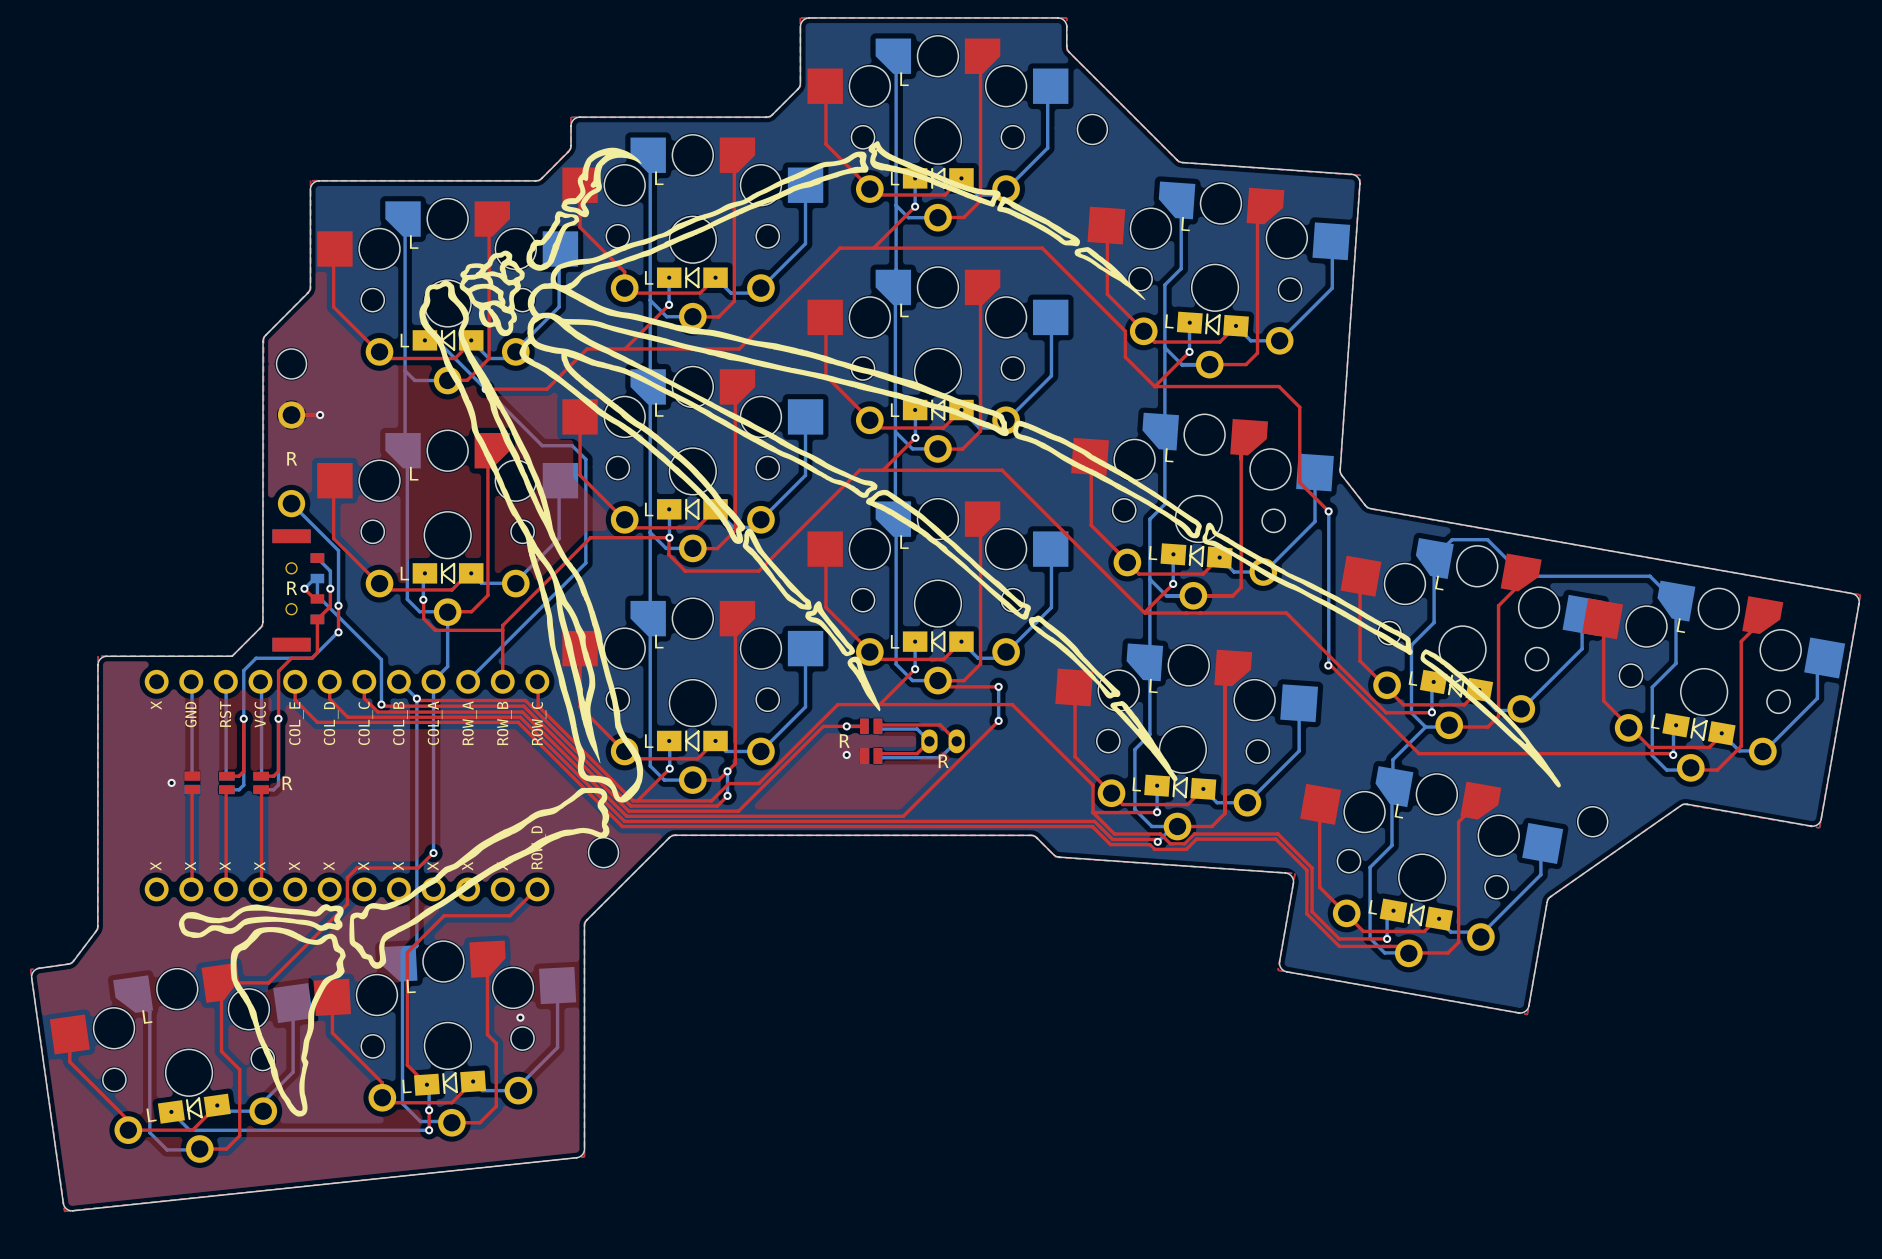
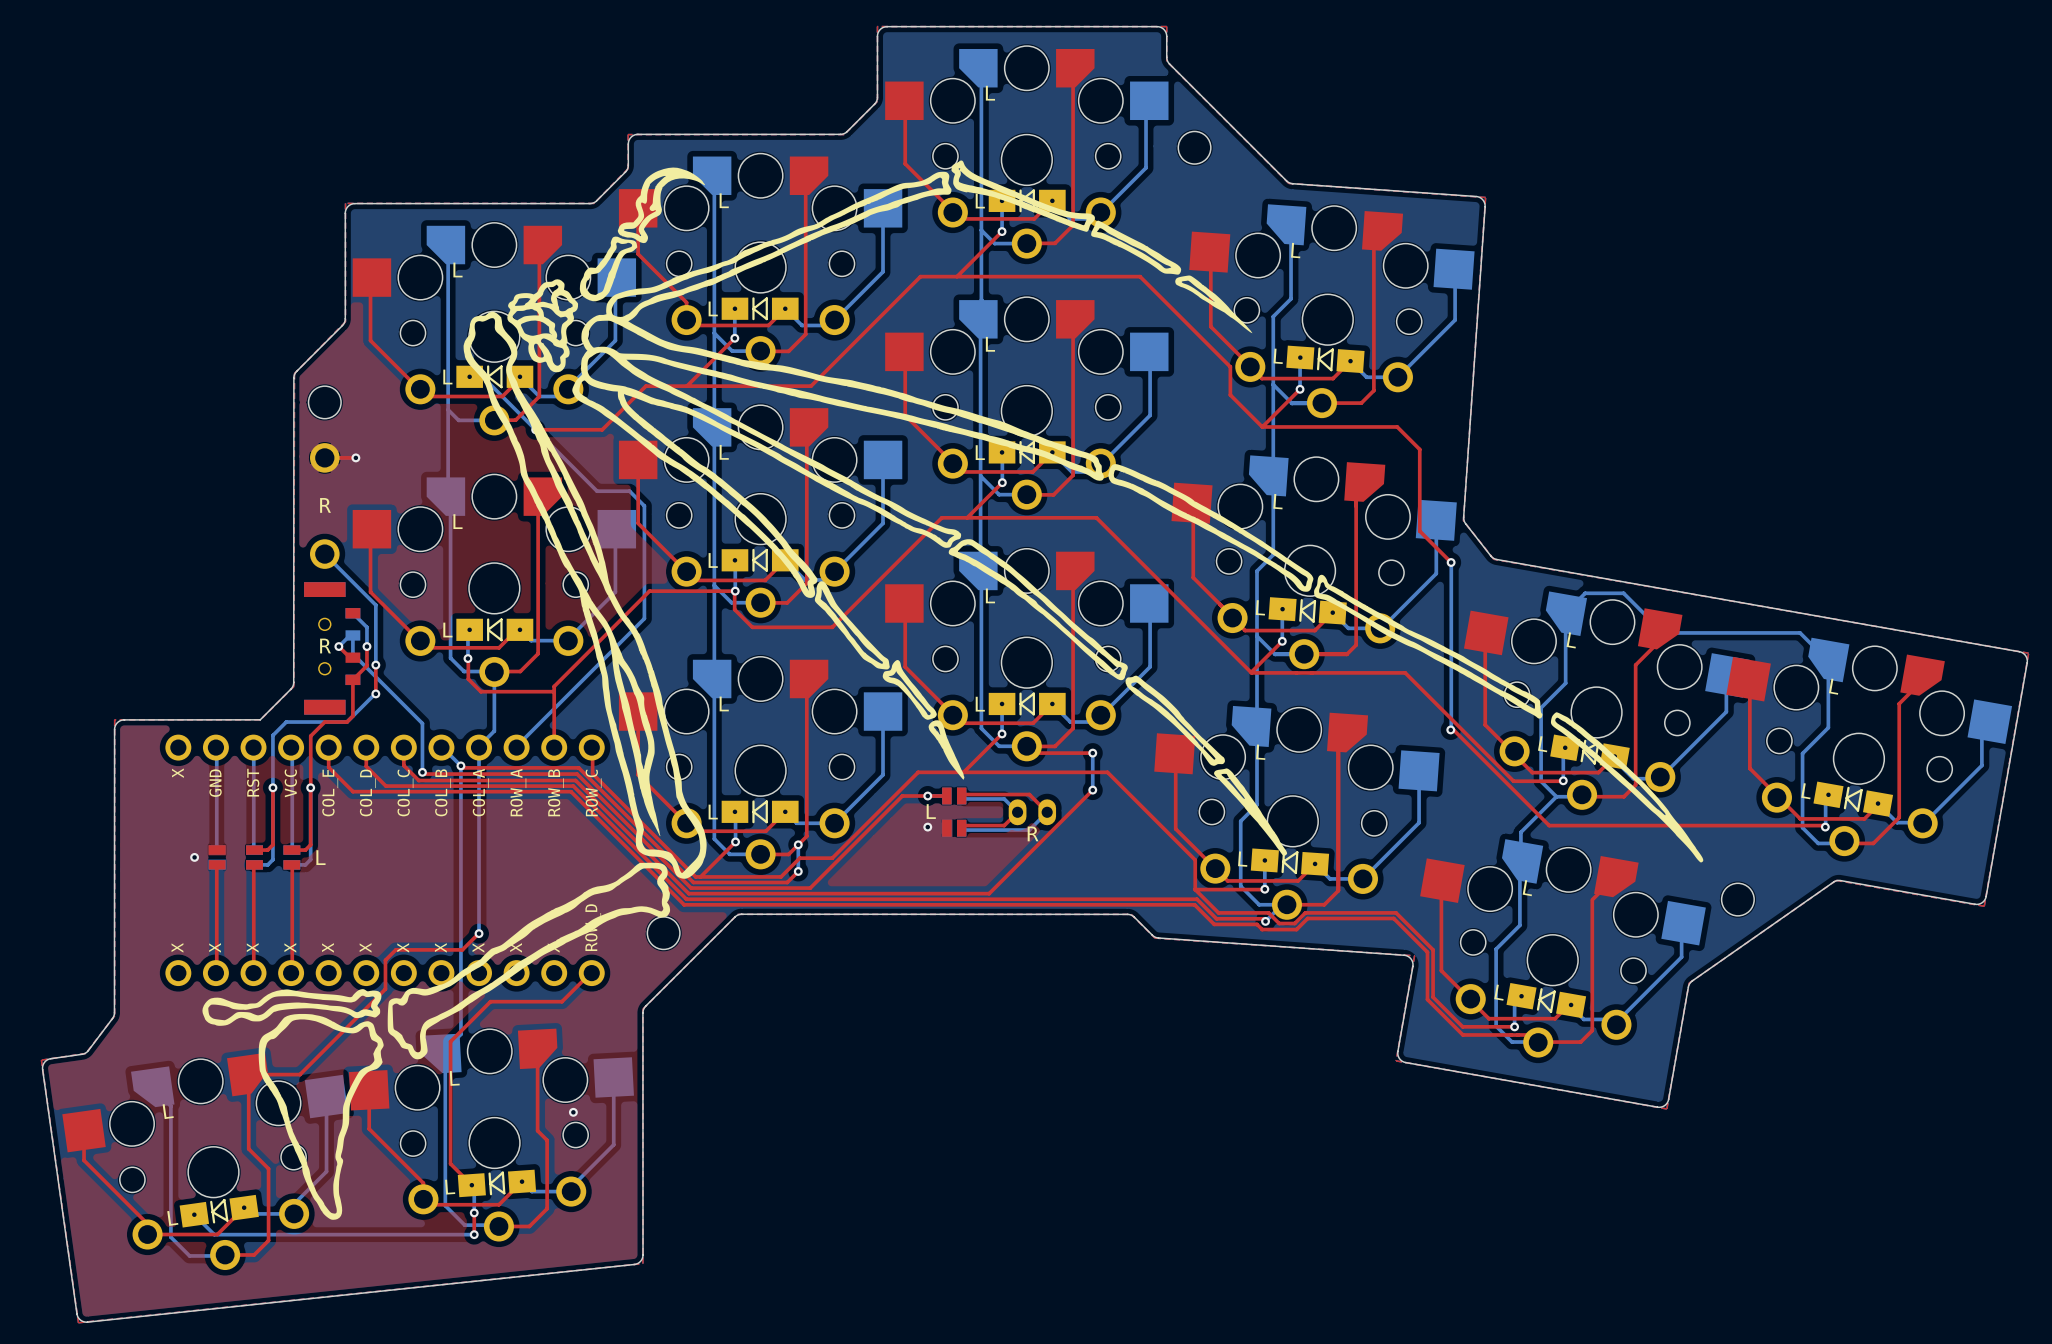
text: none -> L (931, 811)
text: R (844, 741) -> none
text: R (287, 783) -> L (320, 857)

